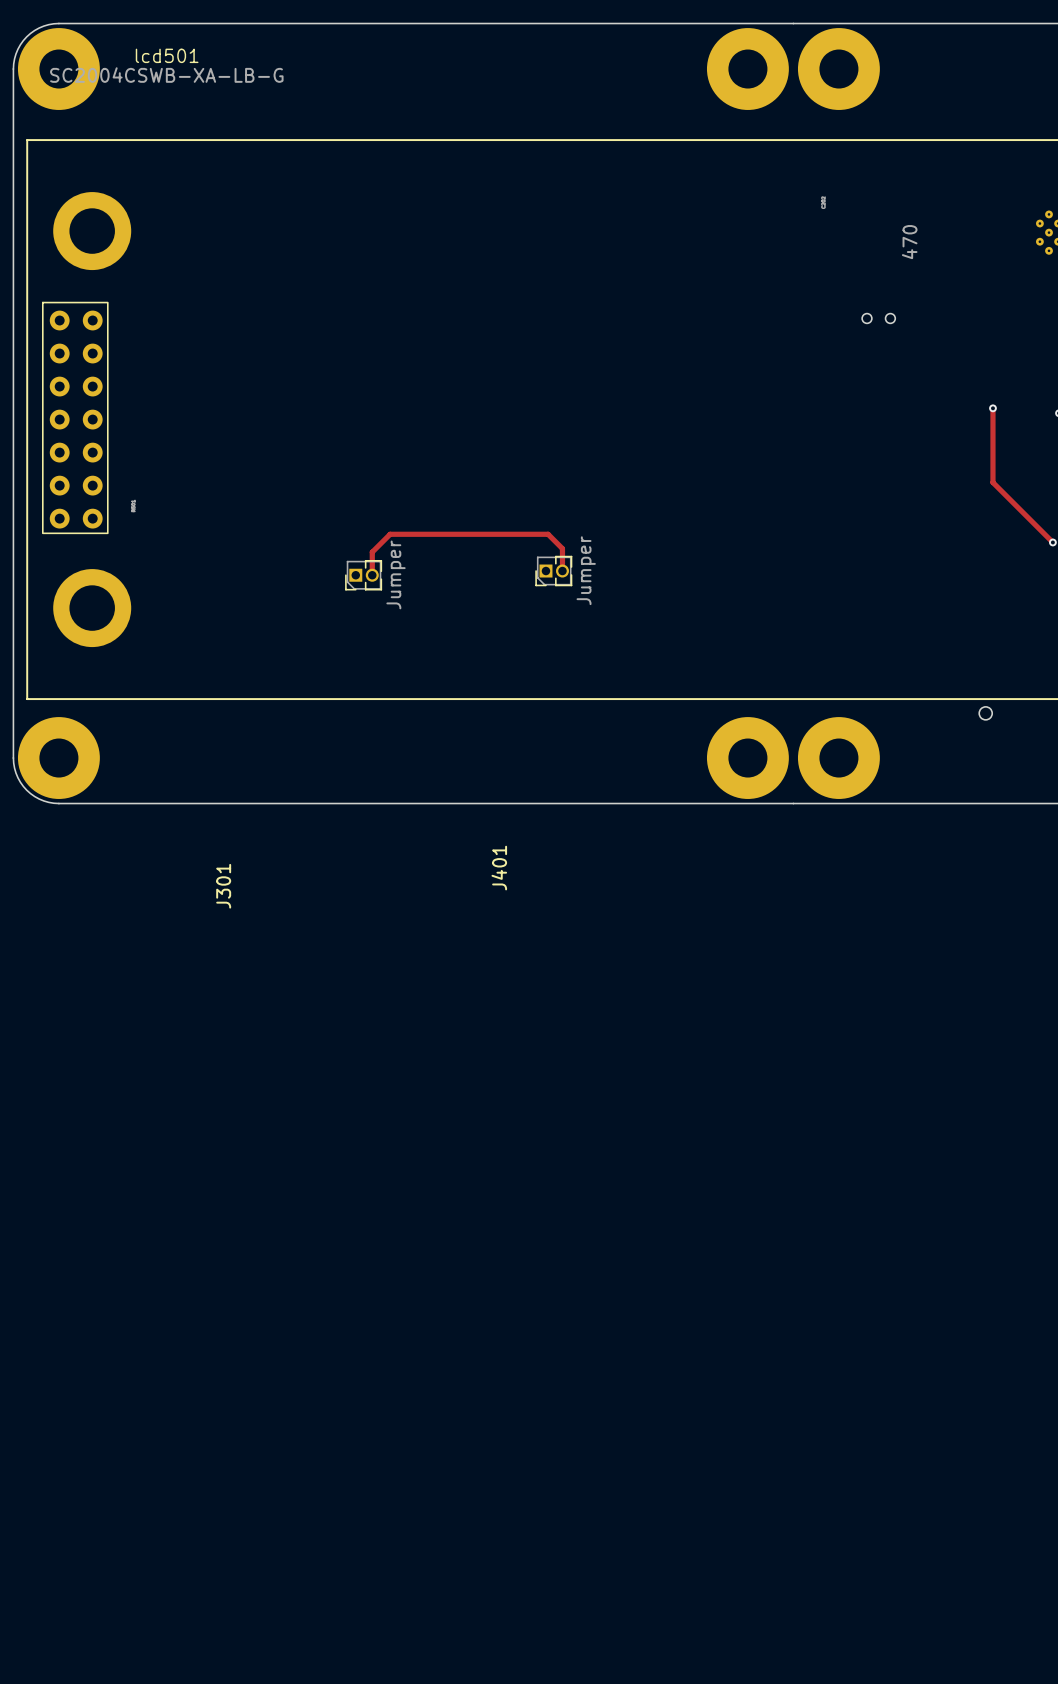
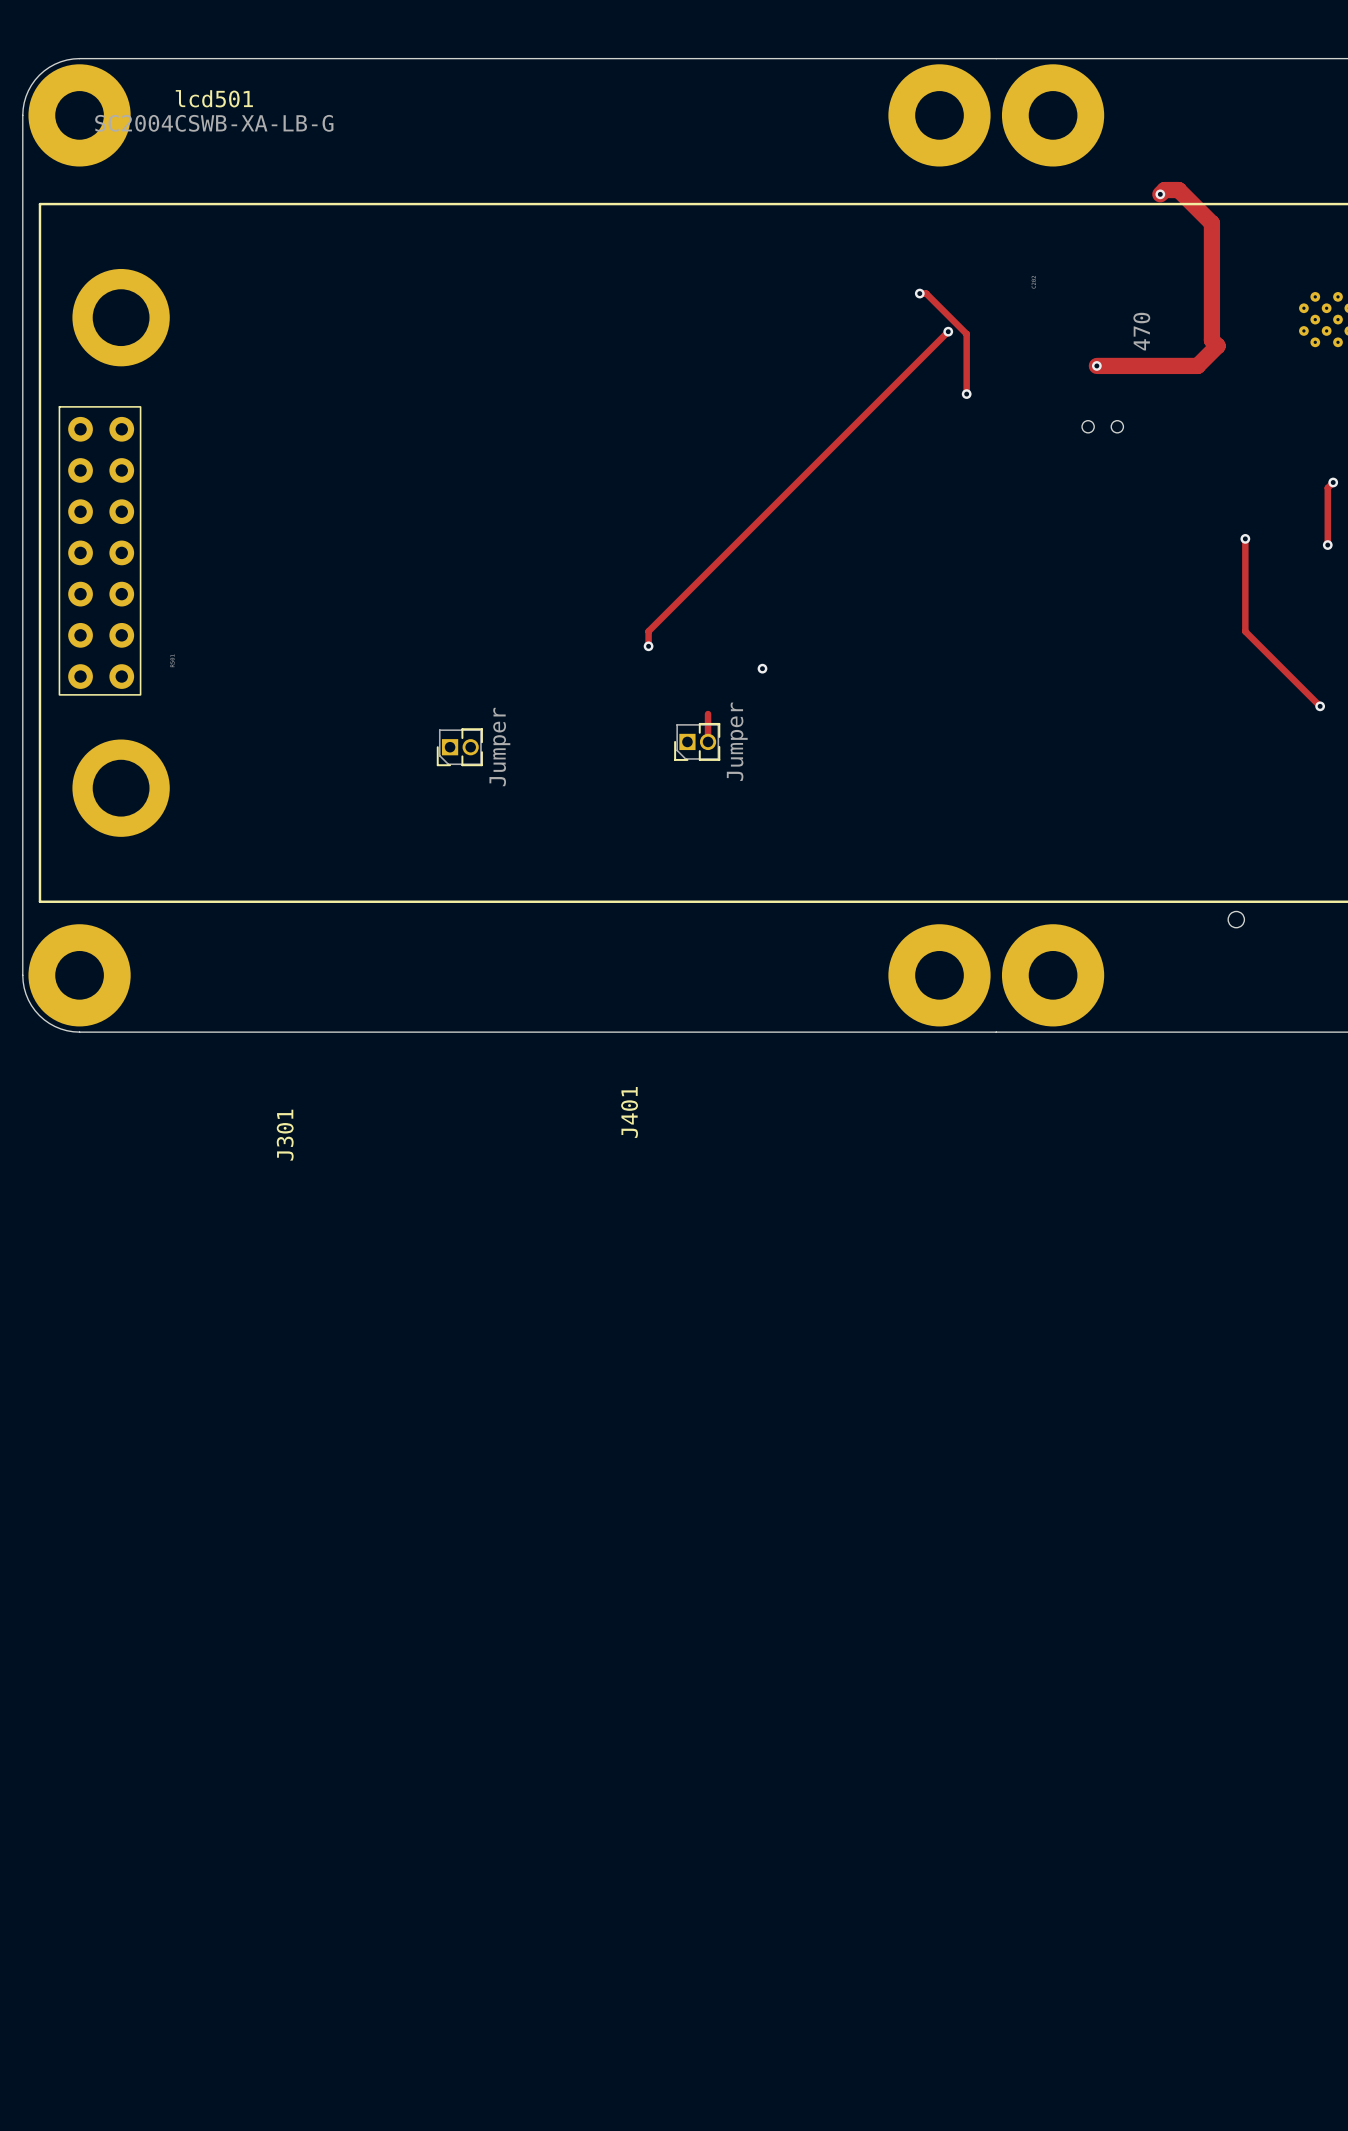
track: none -> (1160, 194) (1164, 190) (1178, 190) (1211, 223) (1211, 340) (1217, 345) (1197, 365) (1096, 365)
via: none -> (1160, 194)
track: none -> (919, 293) (926, 293) (966, 334) (966, 394)
via: none -> (919, 293)
track: none -> (948, 331) (648, 631) (648, 646)
via: none -> (948, 331)
via: none -> (1096, 365)
via: none -> (966, 394)
via: none -> (648, 646)
via: none -> (762, 668)
track: (562, 548) (548, 534) (390, 534) (372, 552) (372, 575) -> none

